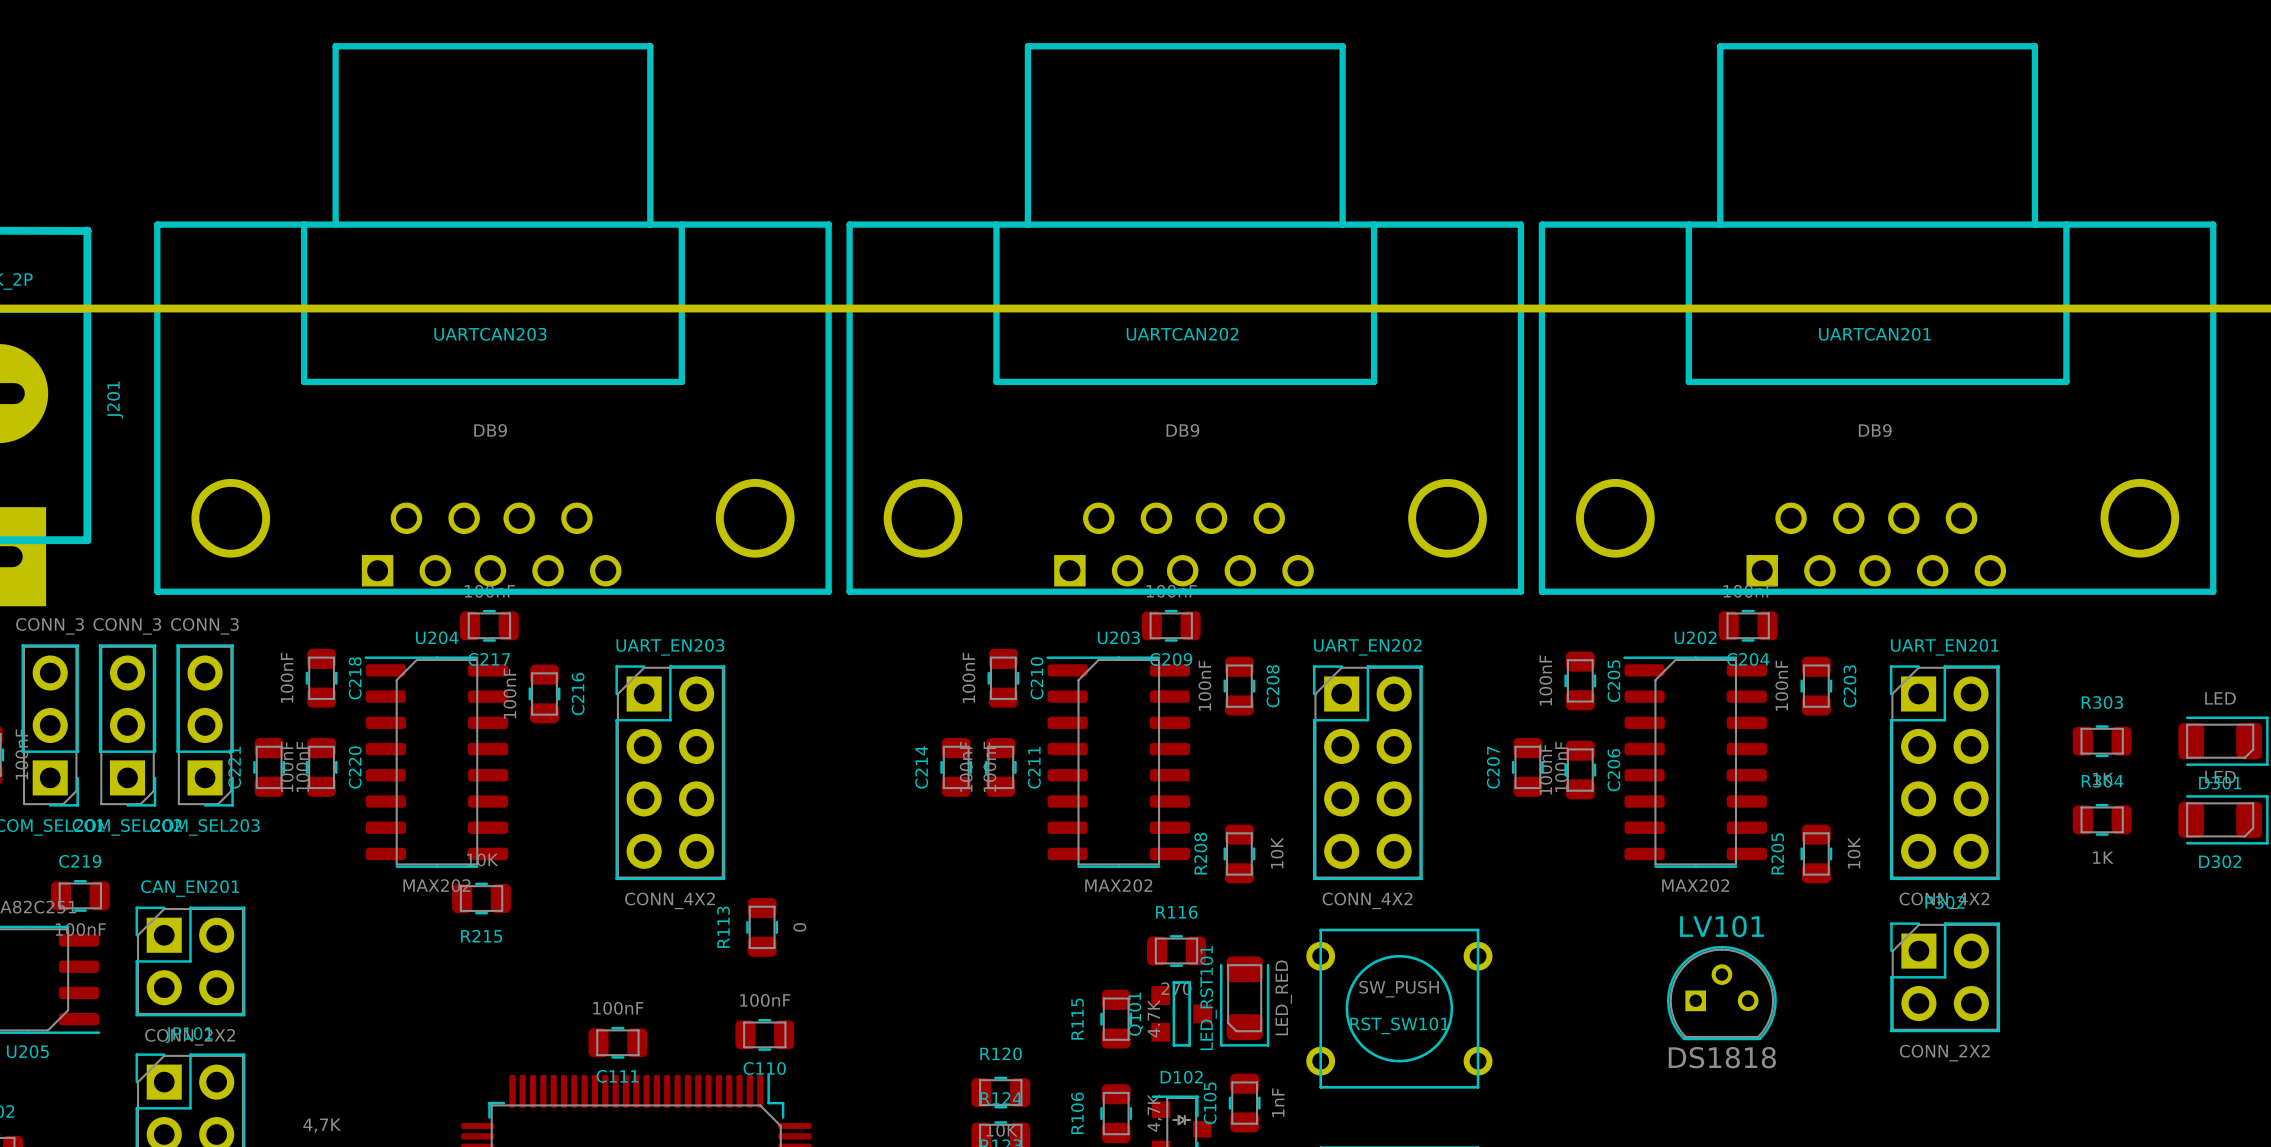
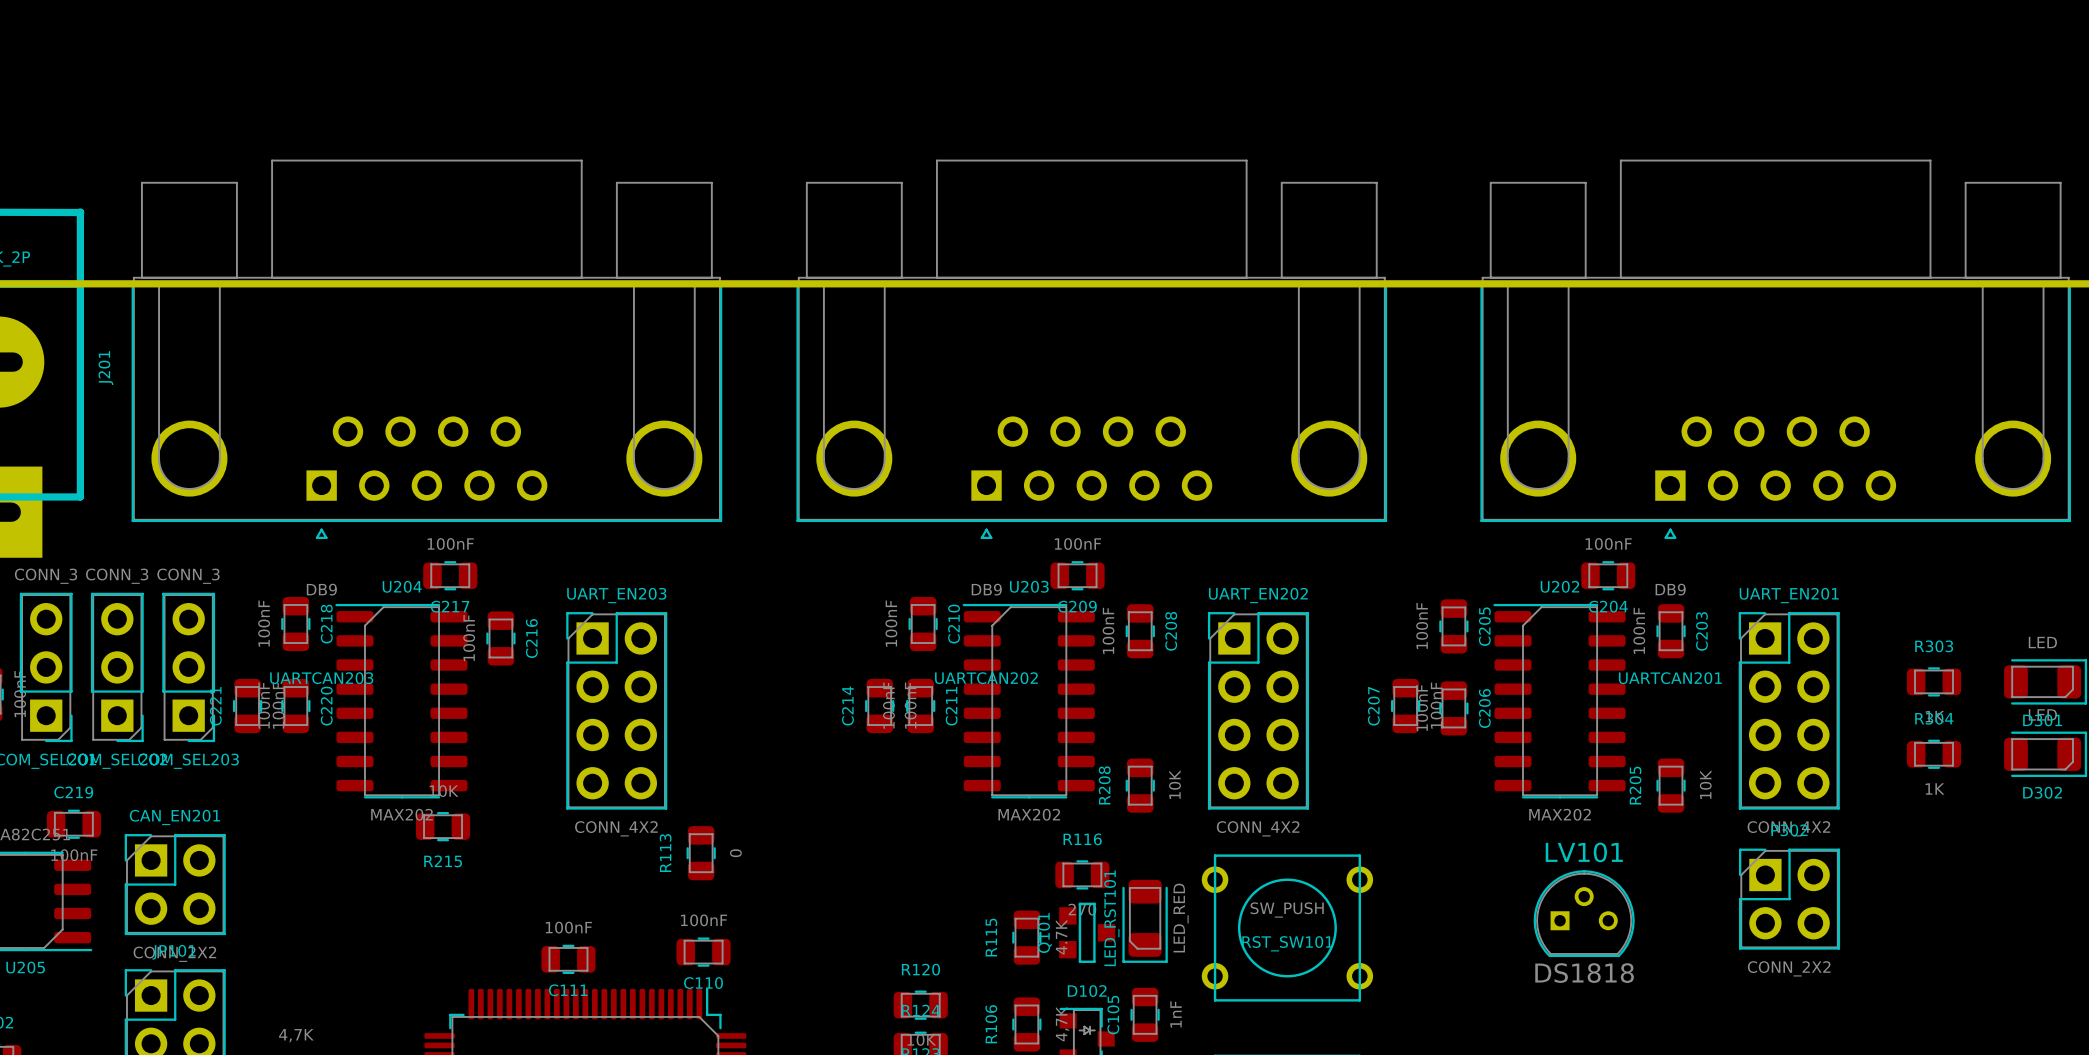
UARTCAN203 footprint: [154, 43, 832, 595] -> [131, 159, 723, 540]
UARTCAN202 footprint: [846, 43, 1525, 595] -> [796, 159, 1388, 540]
UARTCAN201 footprint: [1538, 43, 2217, 595] -> [1480, 159, 2071, 540]
UARTCAN203 name position: UARTCAN203 (490, 334) -> UARTCAN203 (321, 678)
UARTCAN202 name position: UARTCAN202 (1182, 334) -> UARTCAN202 (986, 678)
UARTCAN201 name position: UARTCAN201 (1874, 334) -> UARTCAN201 (1670, 678)
UARTCAN203 value position: DB9 (490, 430) -> DB9 (321, 589)
UARTCAN202 value position: DB9 (1182, 430) -> DB9 (986, 589)
UARTCAN201 value position: DB9 (1875, 430) -> DB9 (1670, 589)

